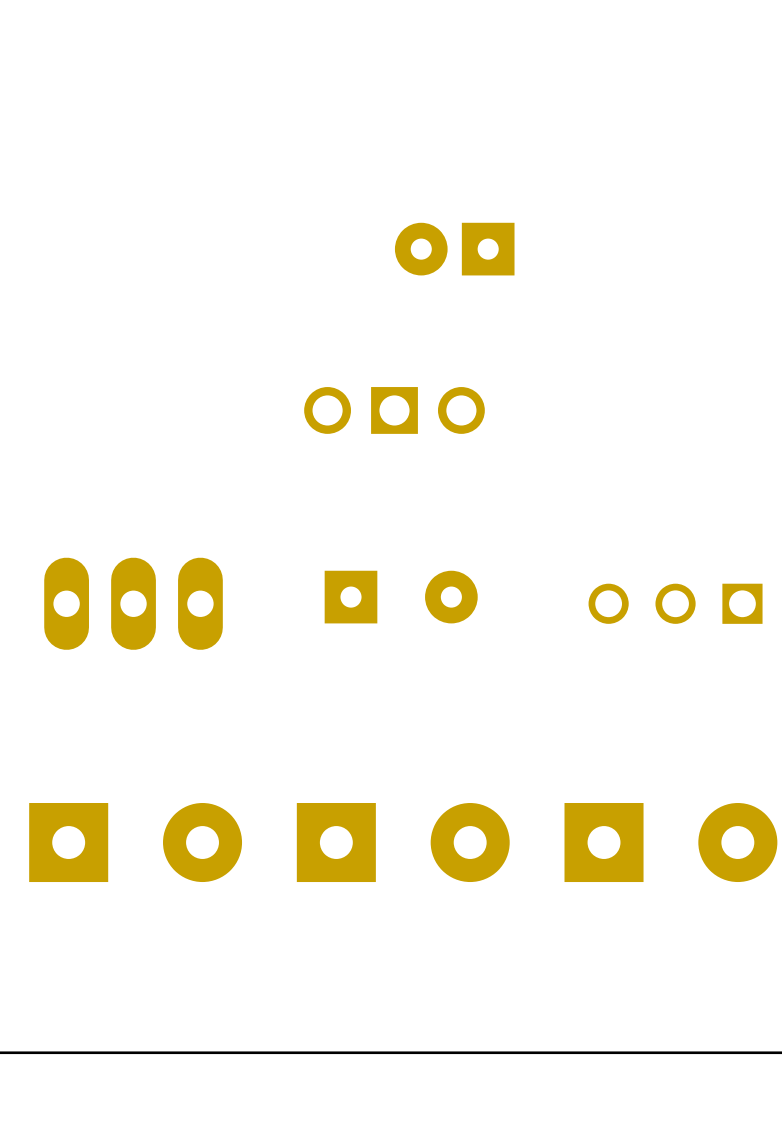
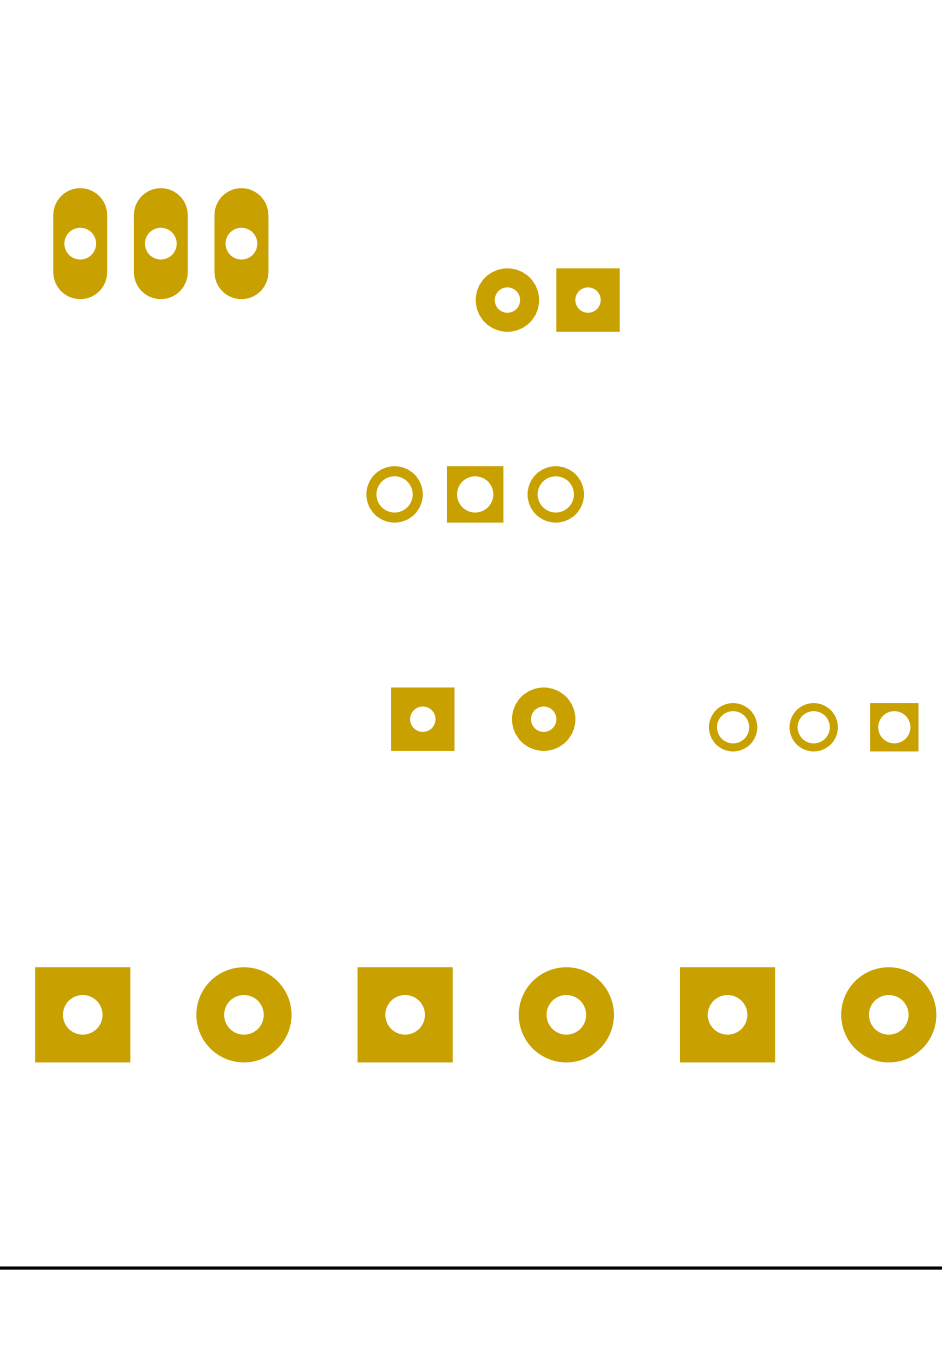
part position: (133, 603) -> (160, 243)

